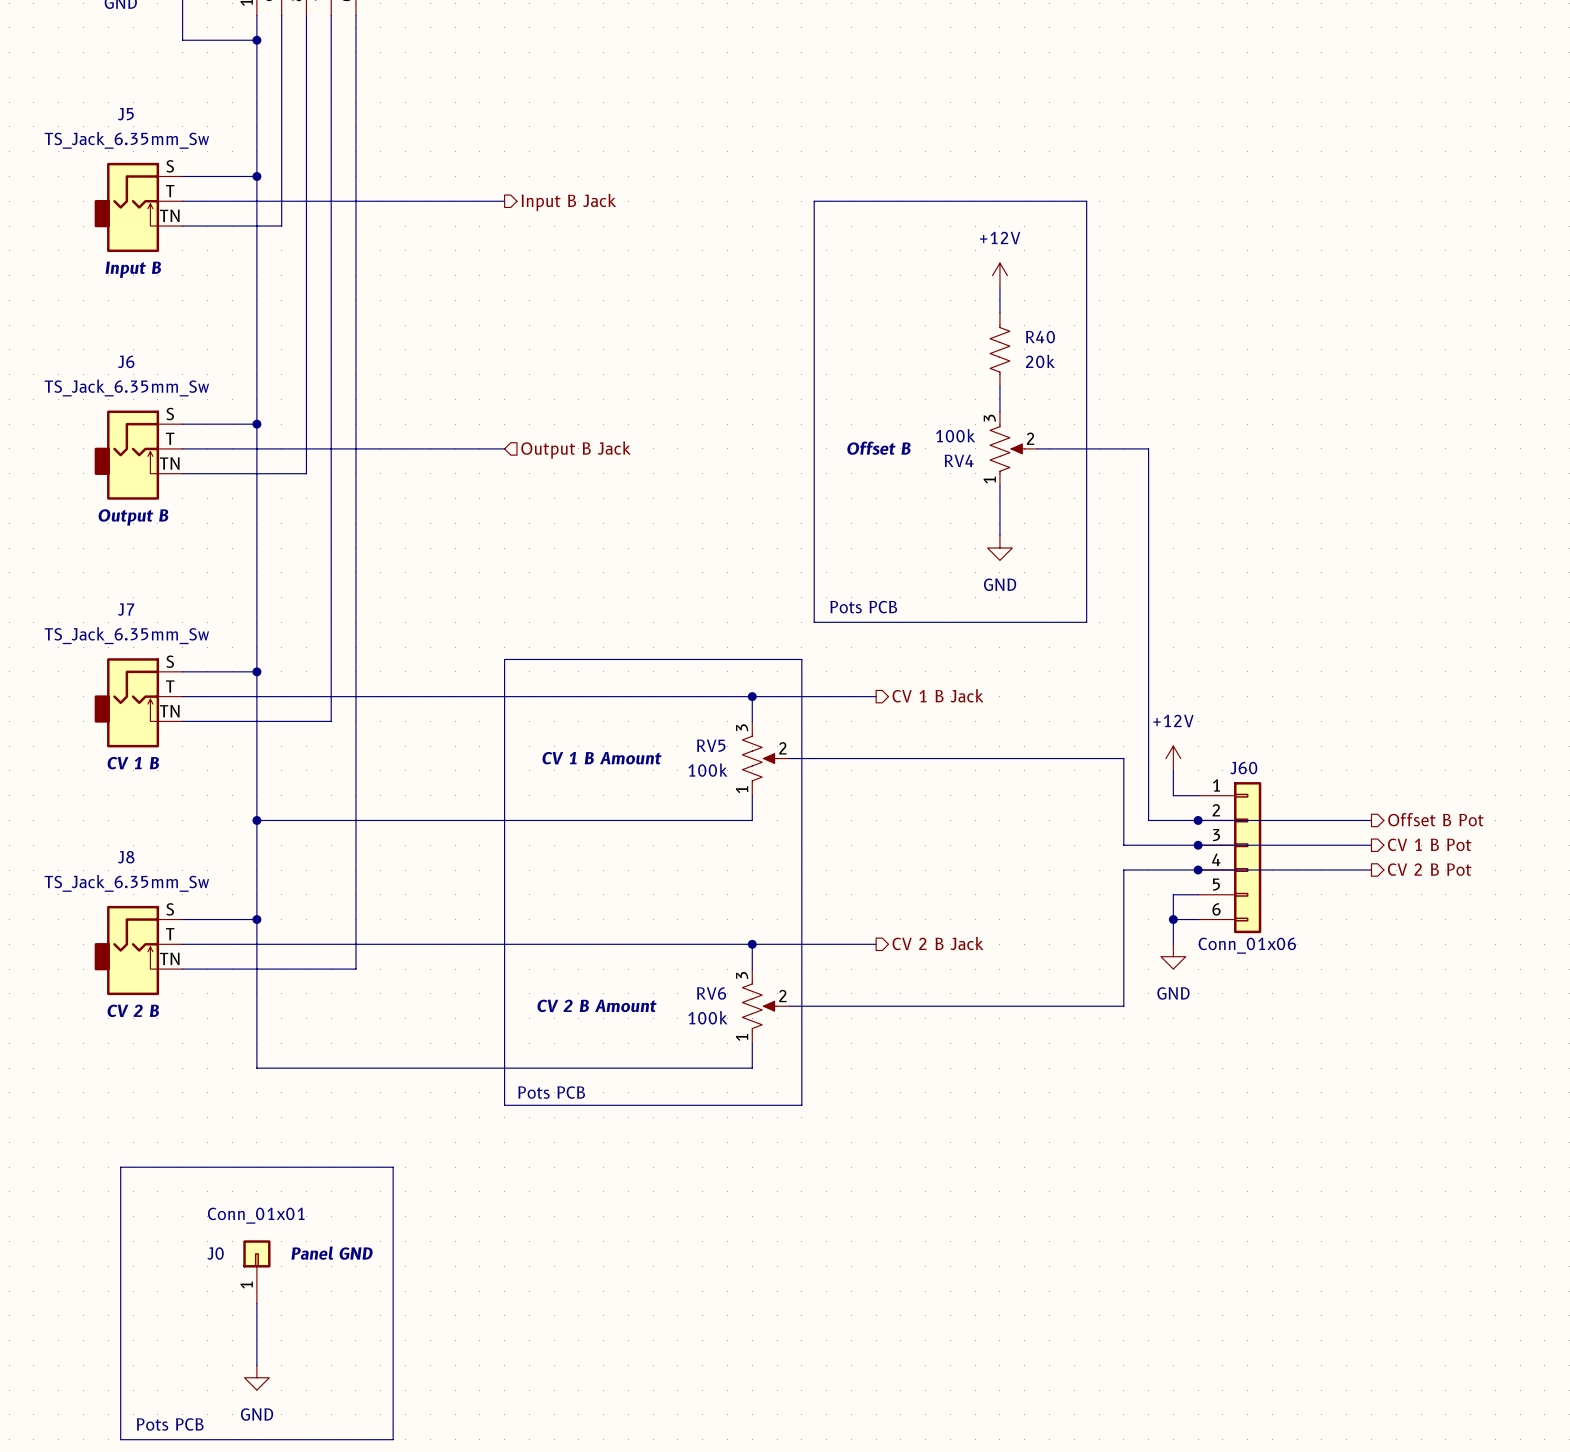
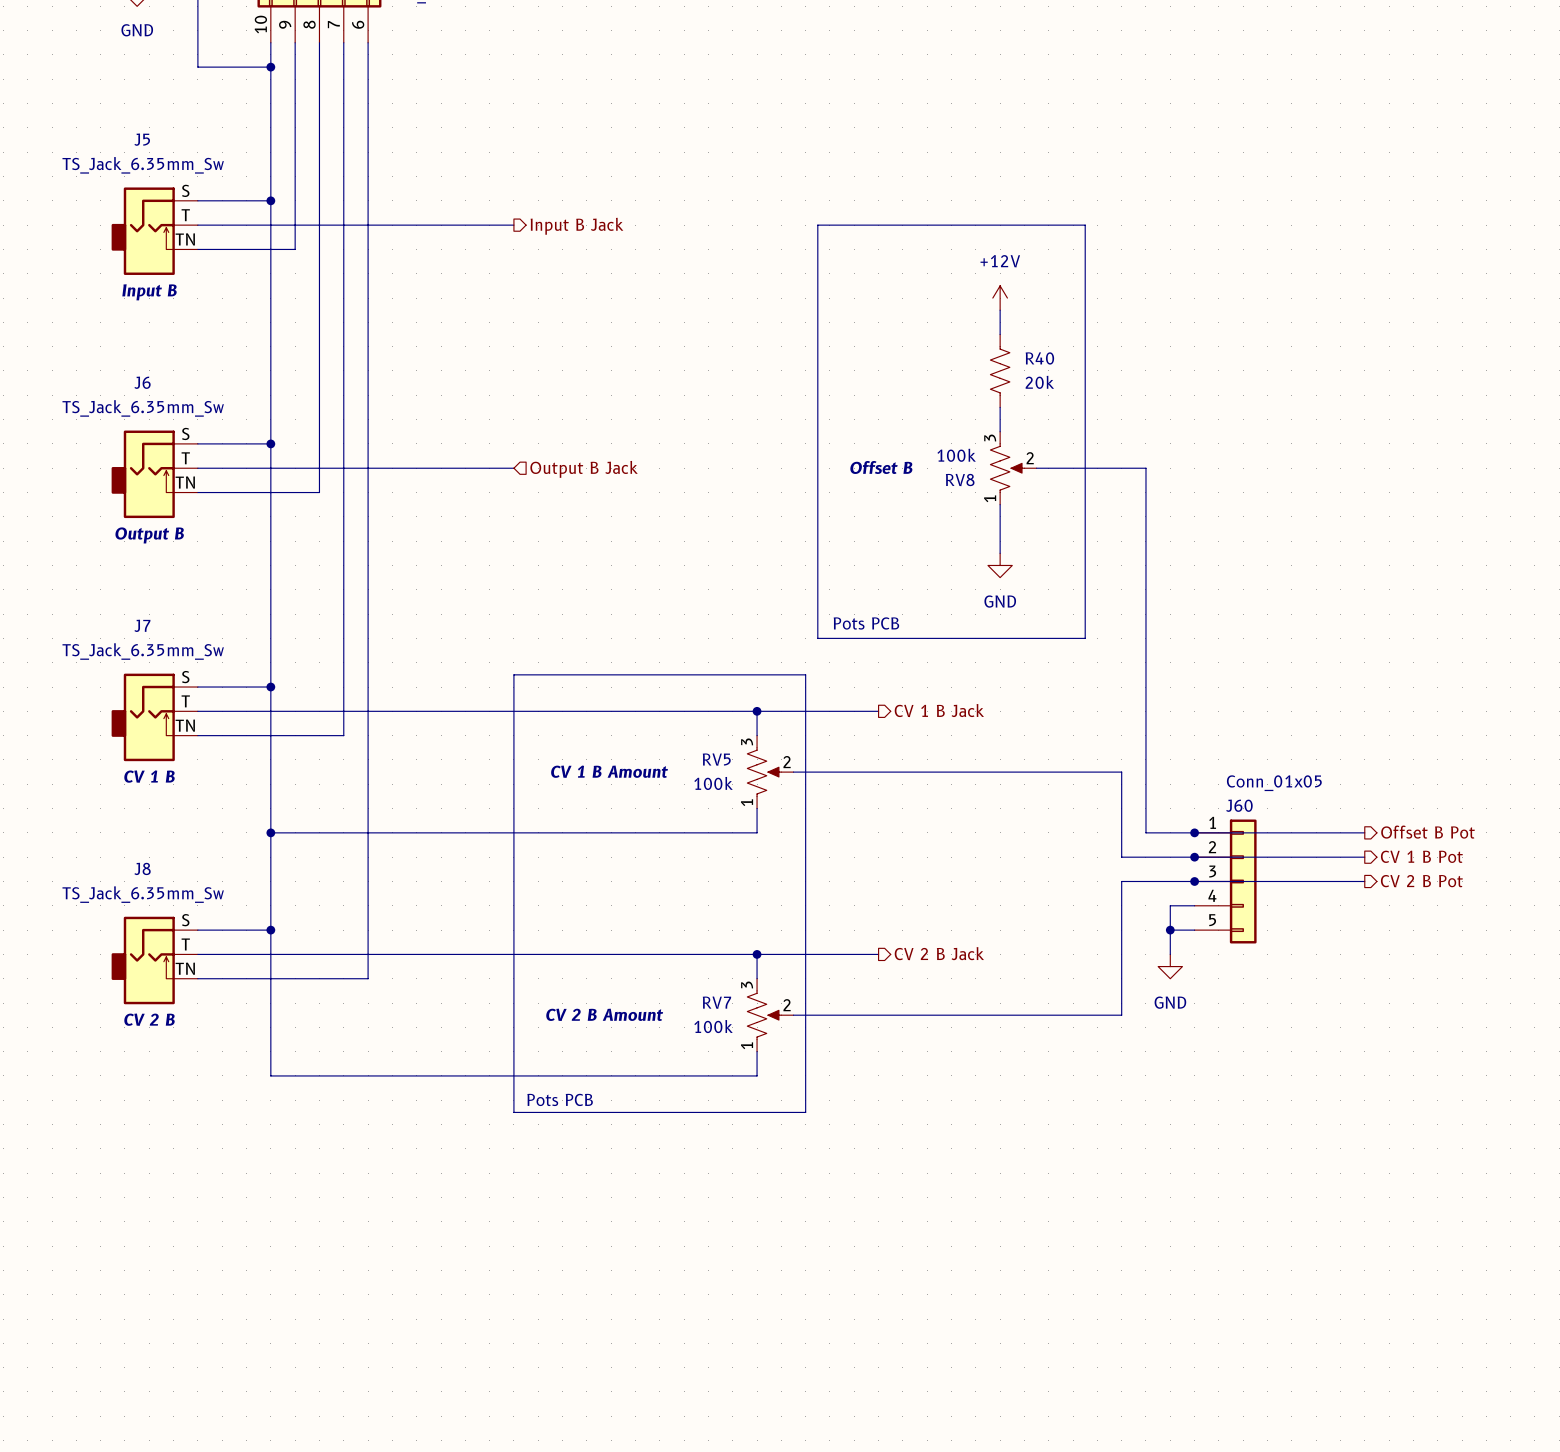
RV4 name: RV4 (959, 460) -> RV8 (960, 480)
power symbol: +12V (1173, 758) -> none
wire: (1173, 770) (1173, 795) (1198, 795) -> none
J60 symbol: [1198, 782, 1262, 934] -> [1194, 819, 1257, 944]
J60 value: Conn_01x06 (1247, 945) -> Conn_01x05 (1274, 783)
RV6 name: RV6 (711, 993) -> RV7 (716, 1002)
line: (120, 1167) (393, 1167) (393, 1439) (120, 1439) (120, 1167) -> none
J0: Conn_01x01 (256, 1271) -> none
wire: (256, 1303) (256, 1365) -> none
power symbol: GND (256, 1377) -> none
text: Pots PCB (170, 1424) -> none

